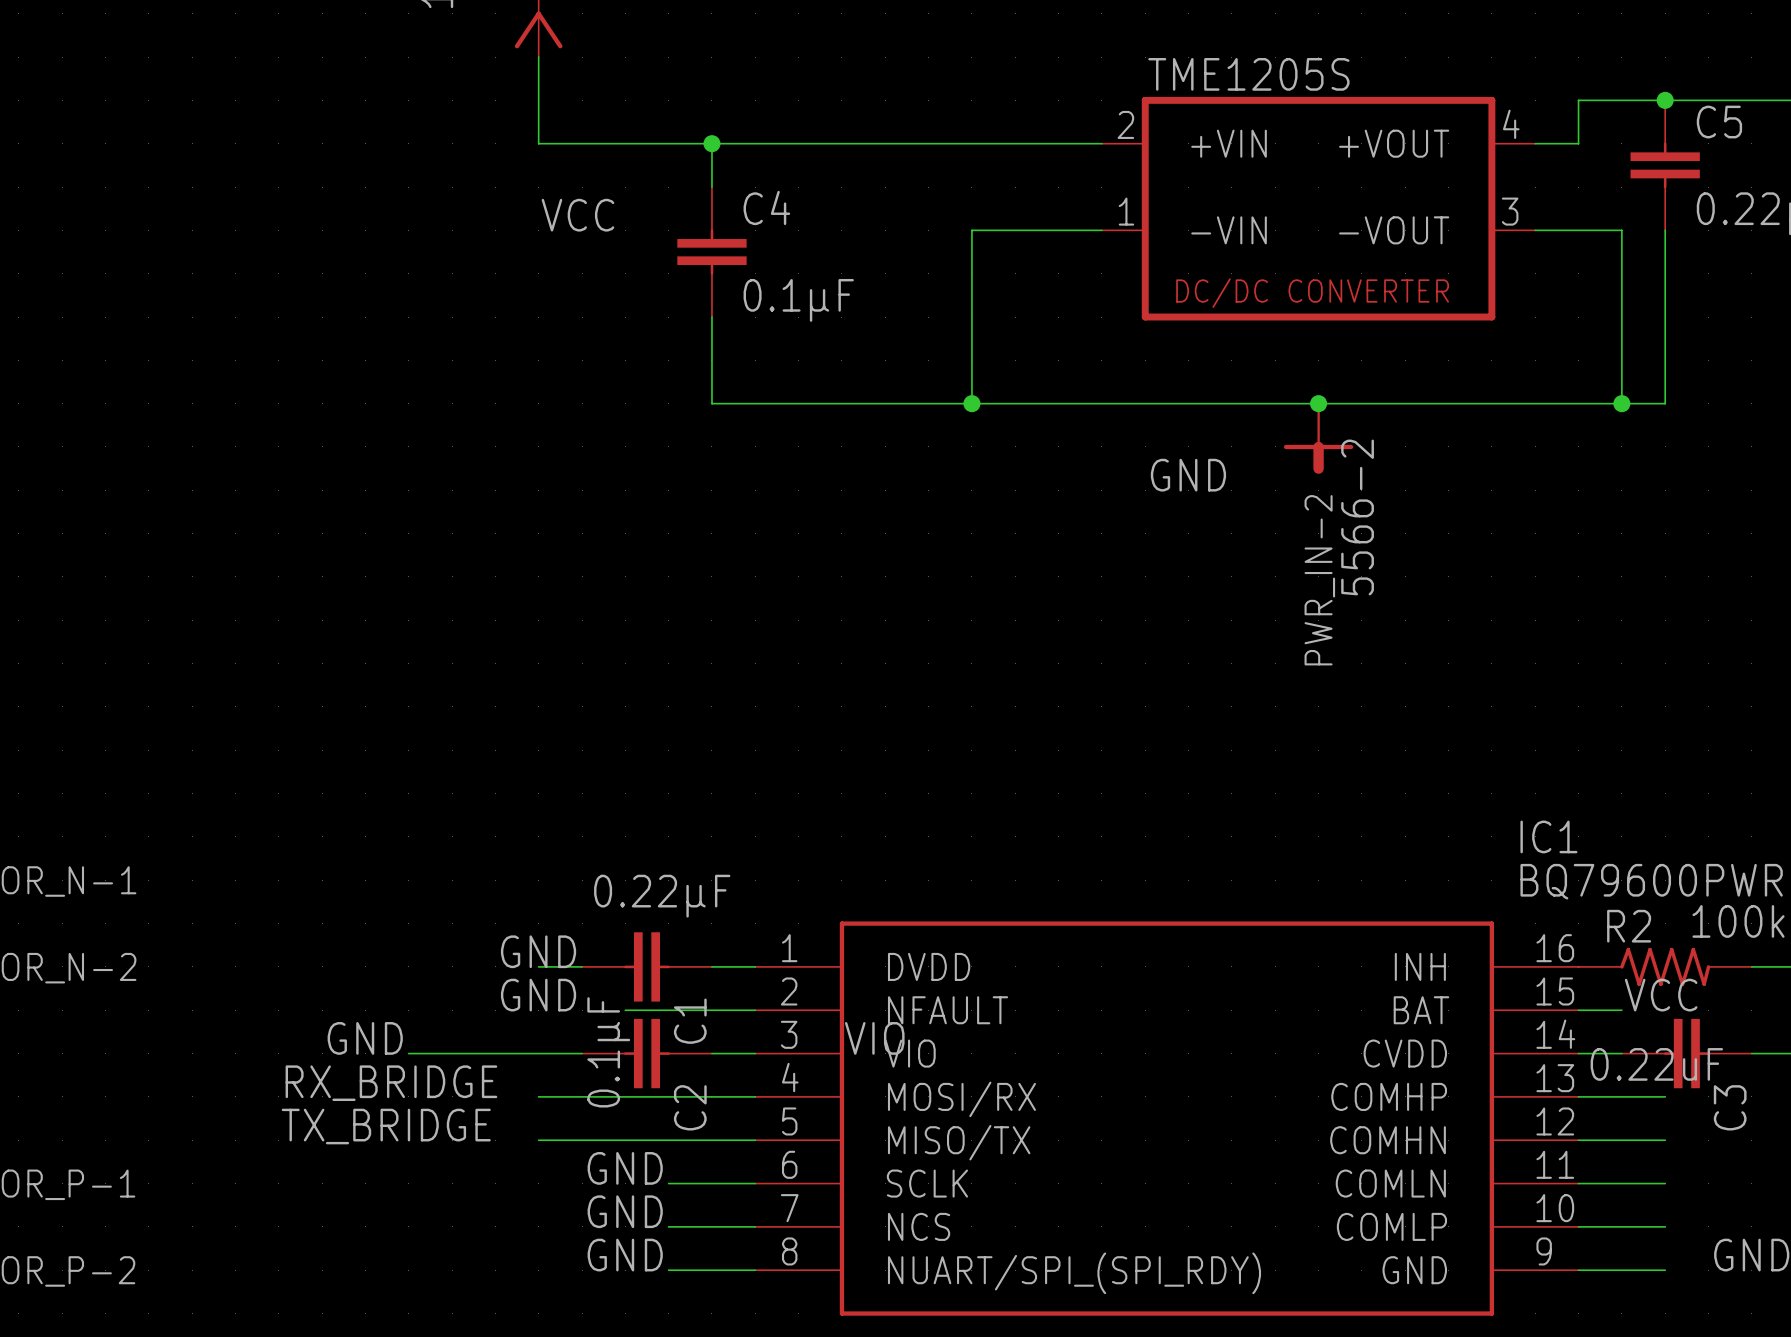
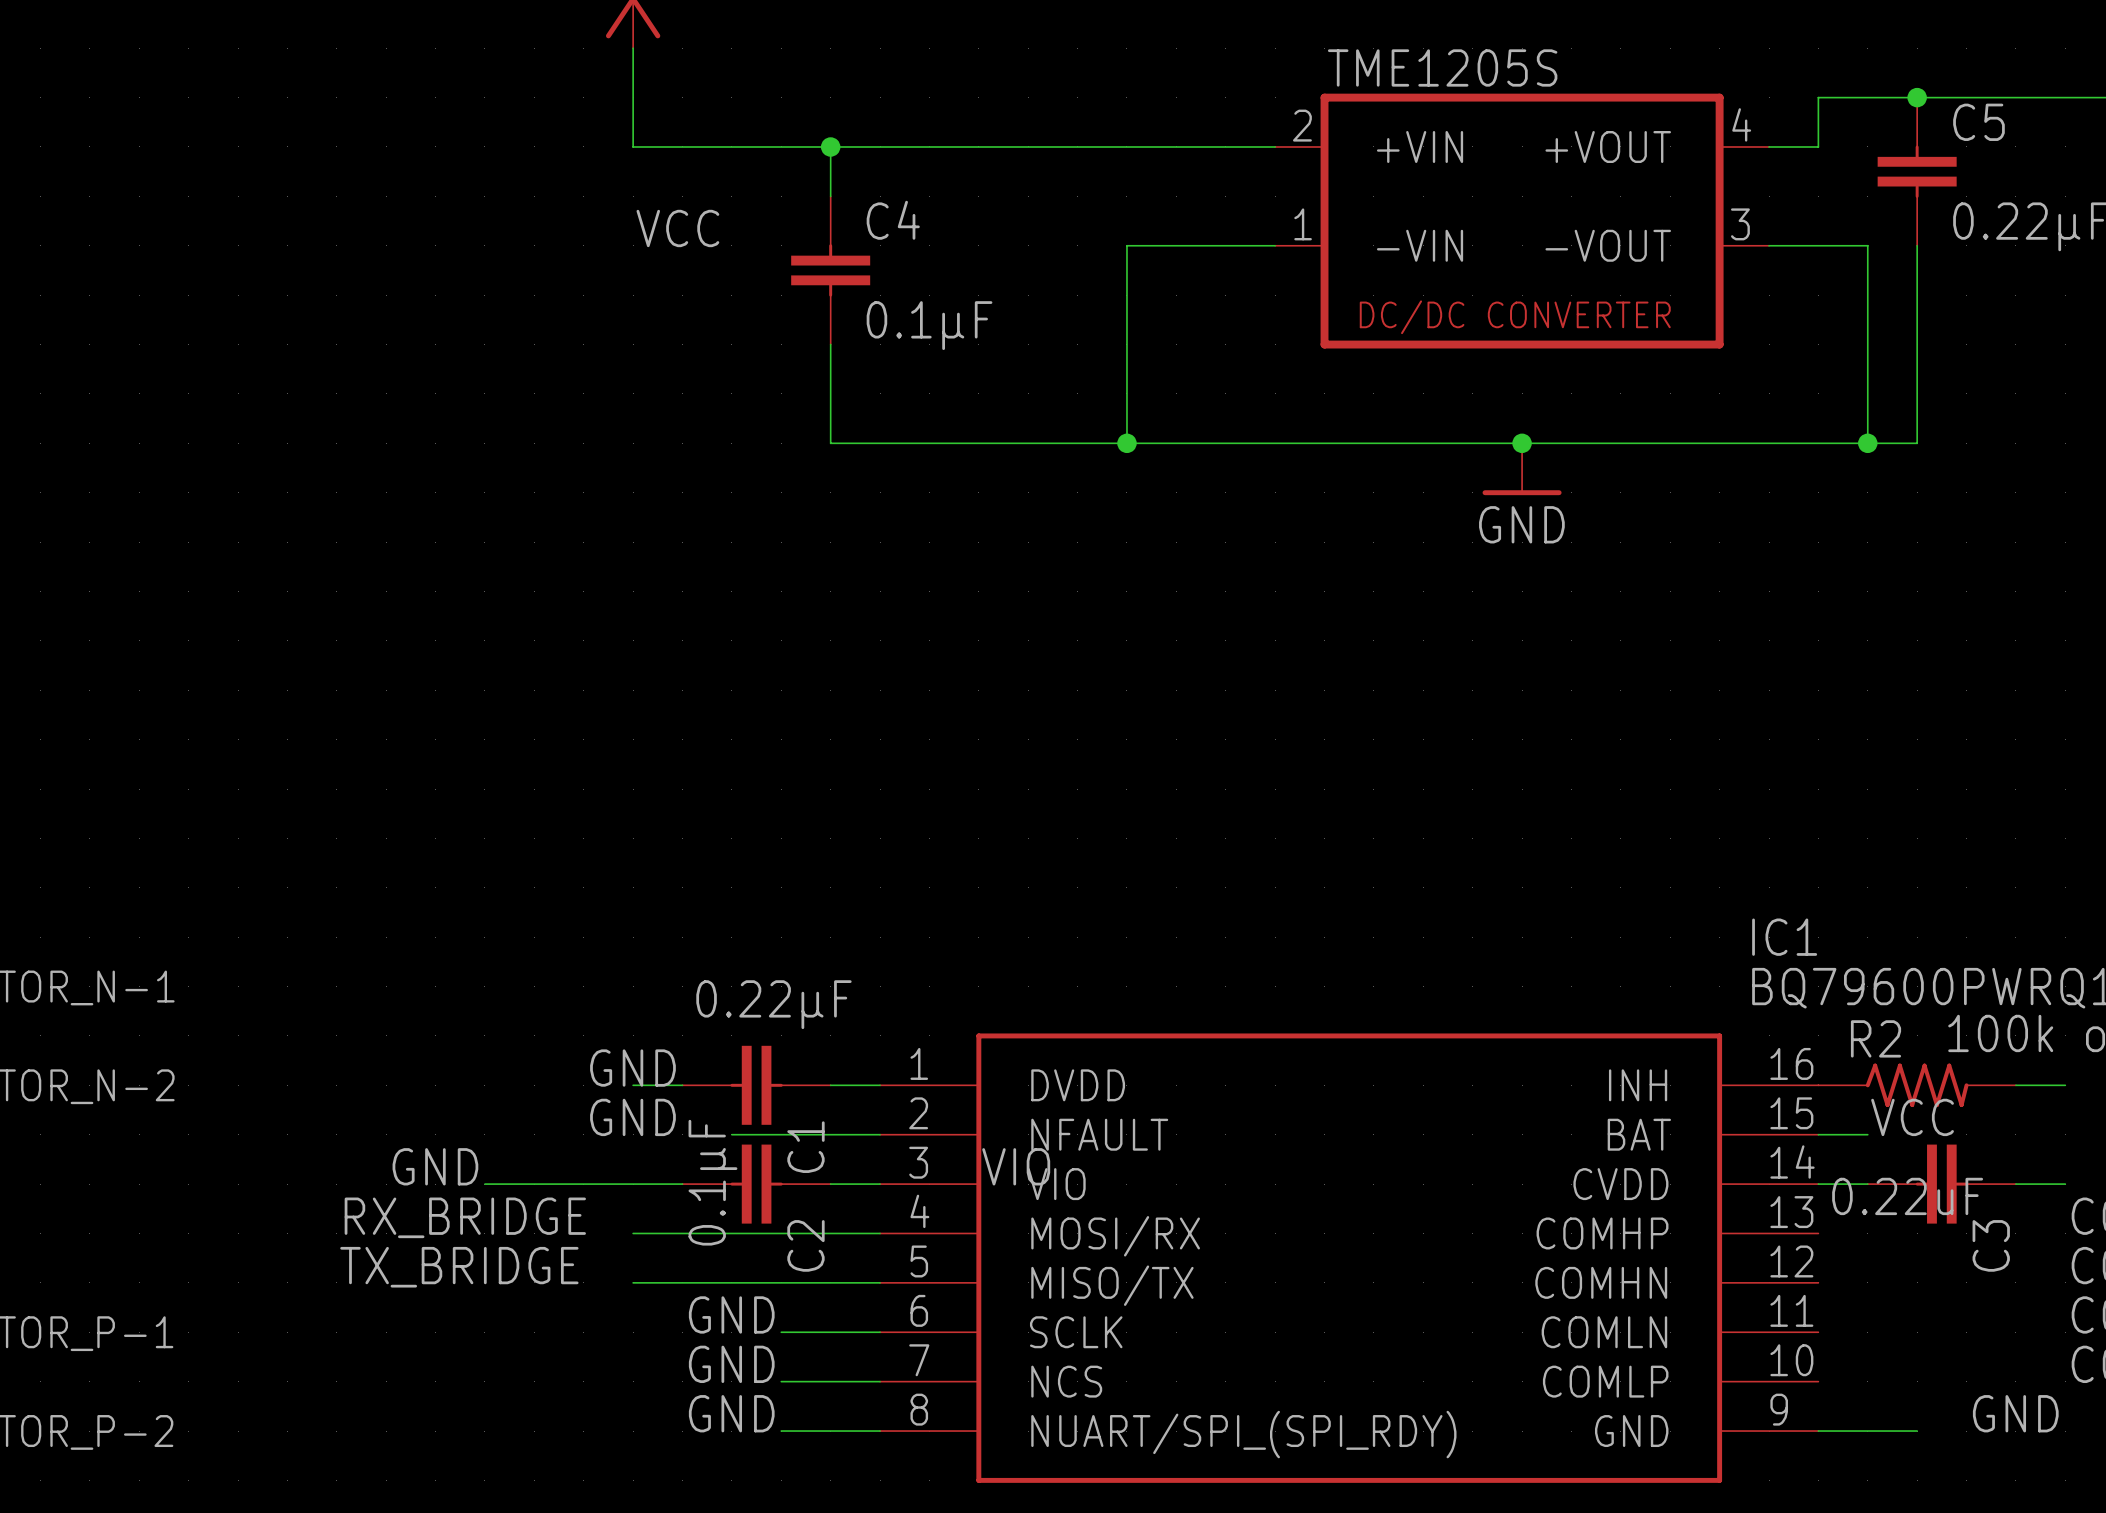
PWR_IN-2: 5566-2 (1318, 438) -> none
power symbol text position: GND (1188, 475) -> GND (1521, 524)
wire: (1578, 1096) (1665, 1096) -> none
wire: (1578, 1140) (1665, 1140) -> none
wire: (1578, 1183) (1665, 1183) -> none
wire: (1578, 1226) (1665, 1226) -> none

